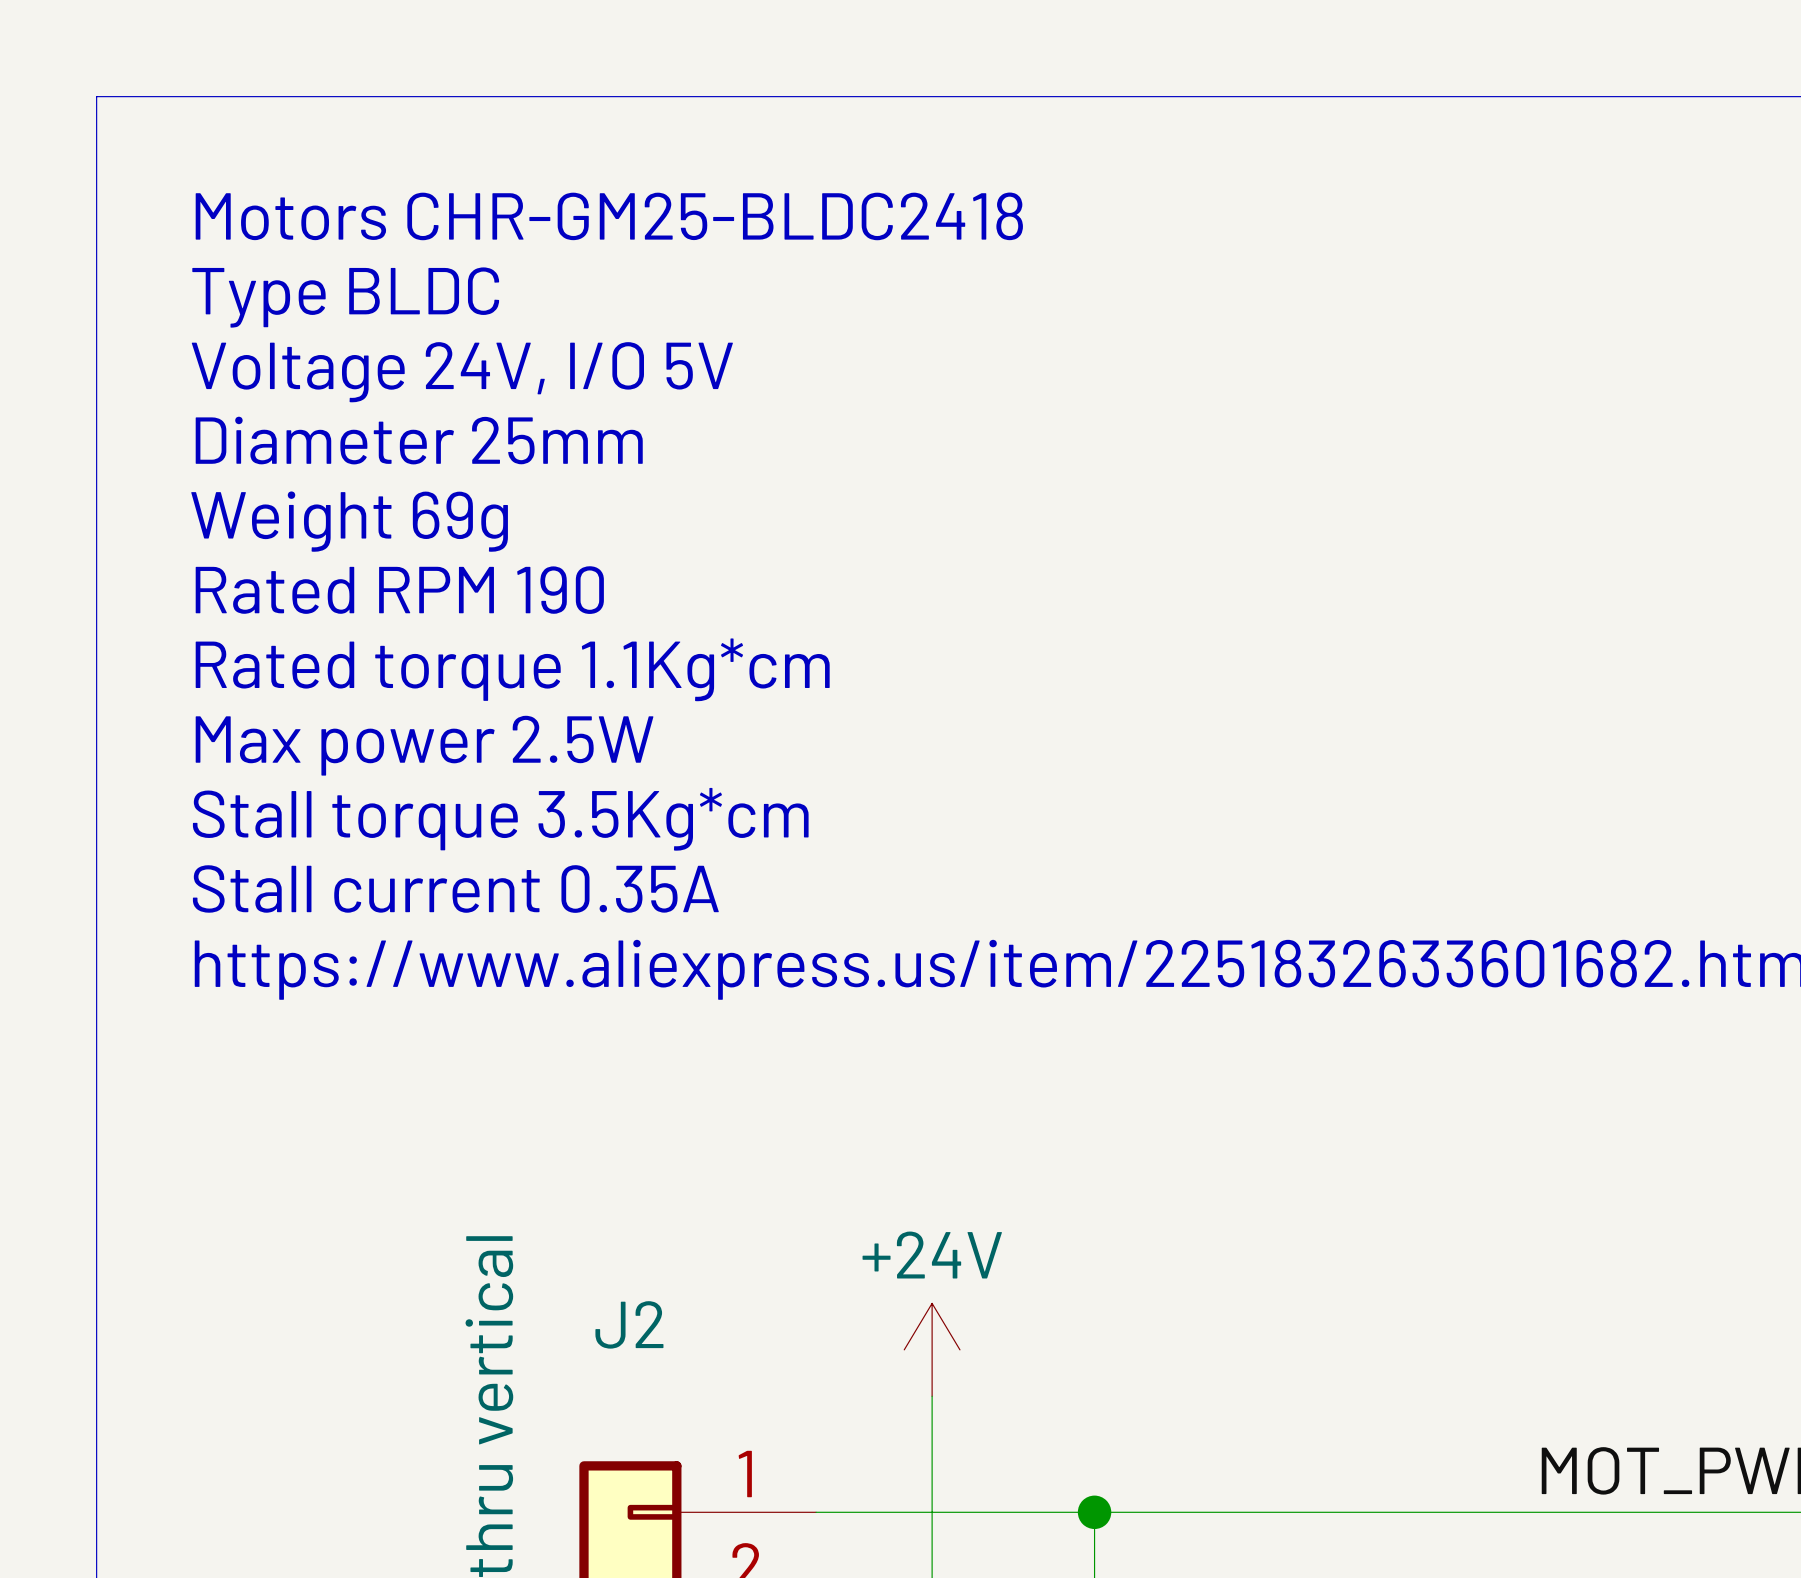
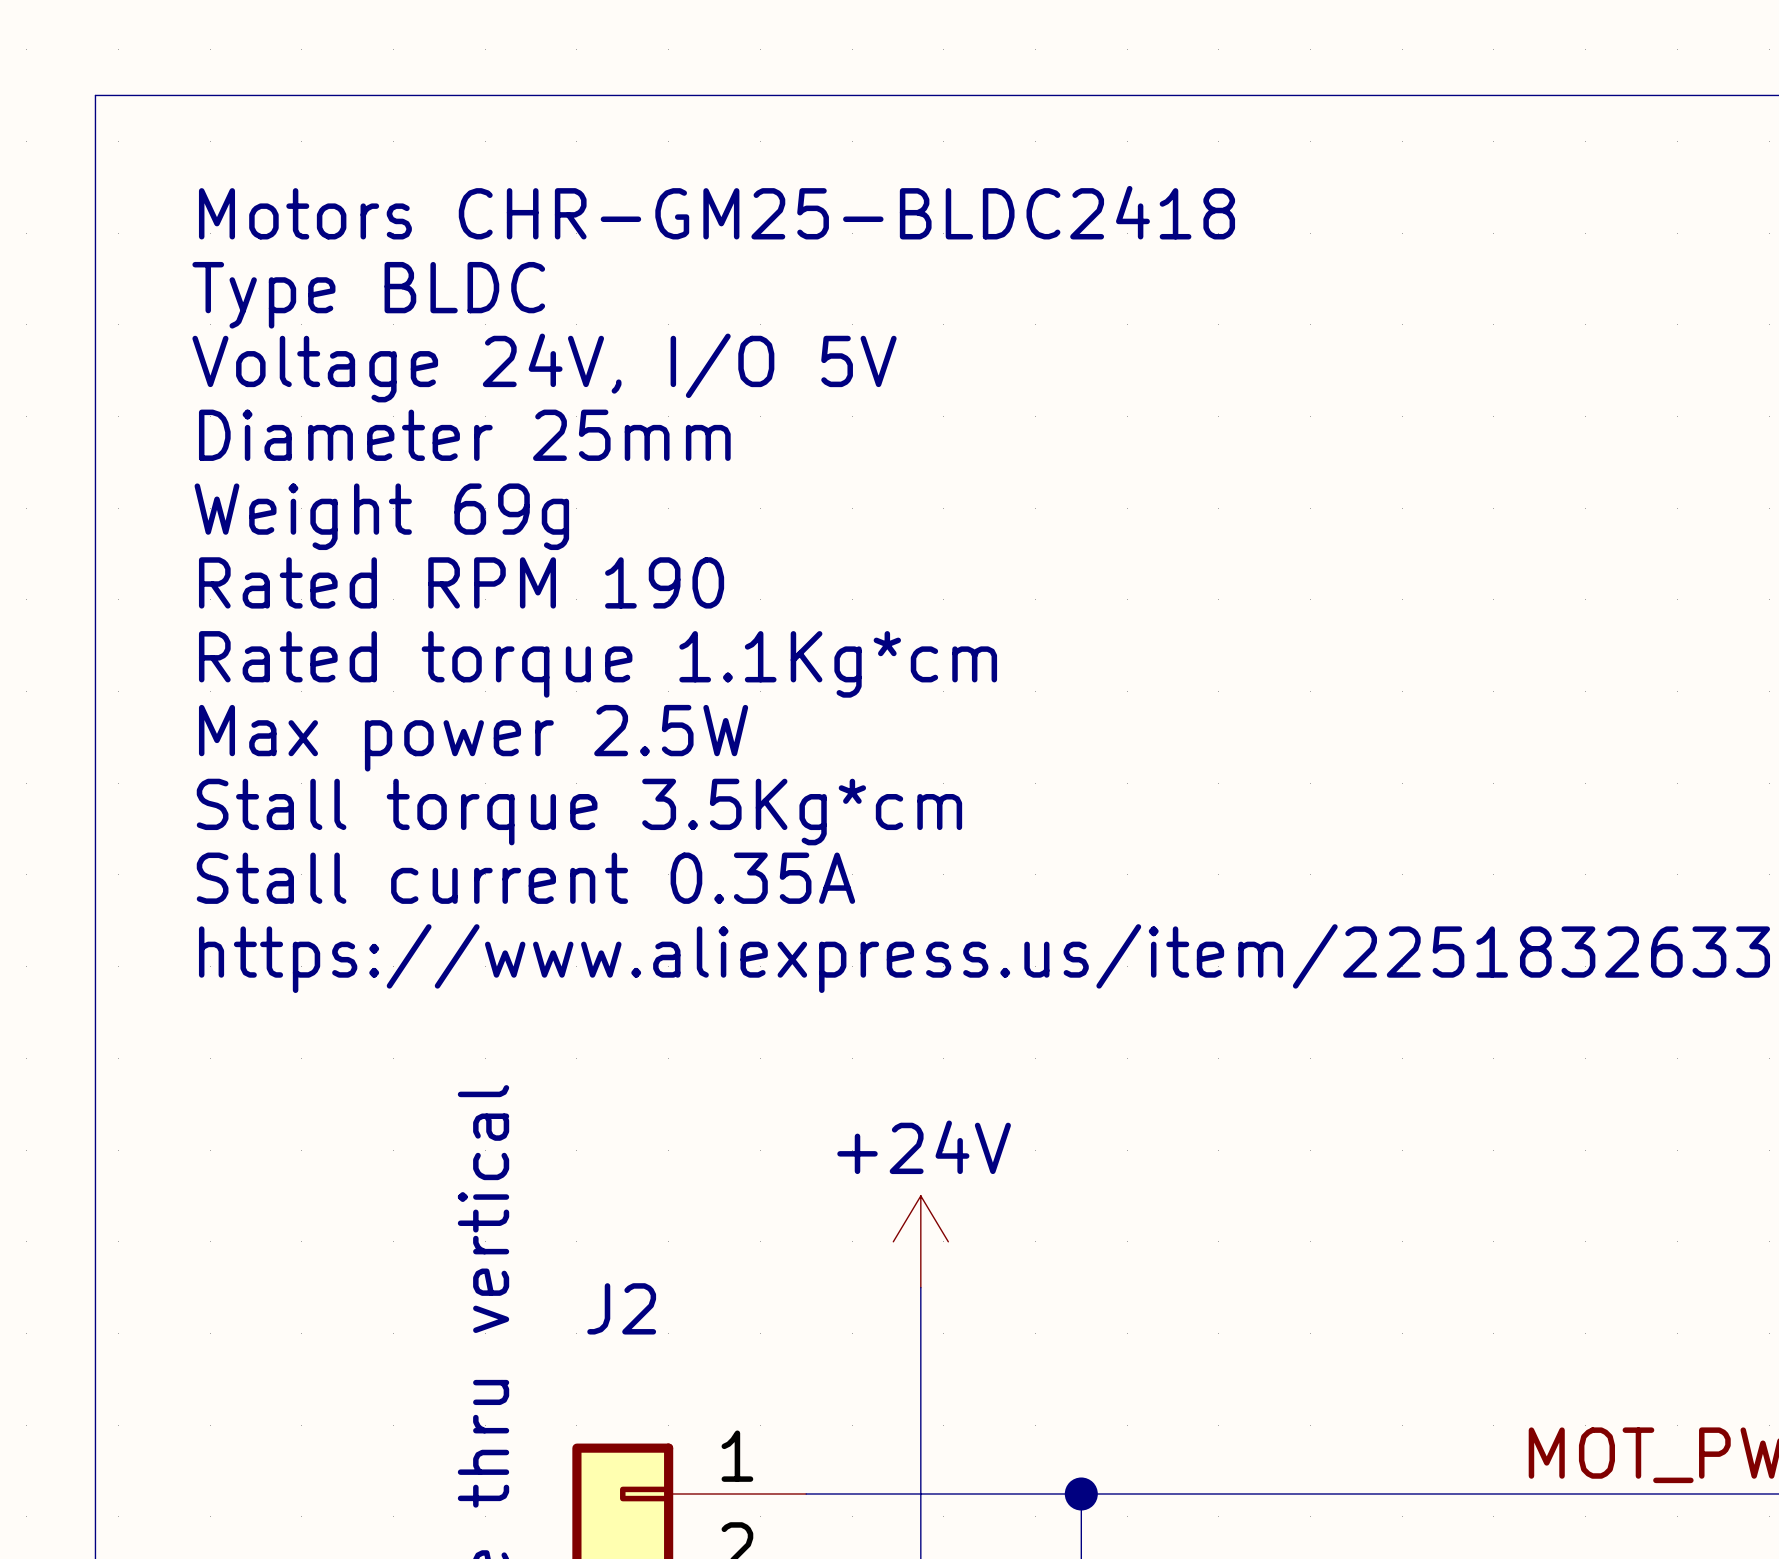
power symbol position: +24V (932, 1349) -> +24V (920, 1241)

